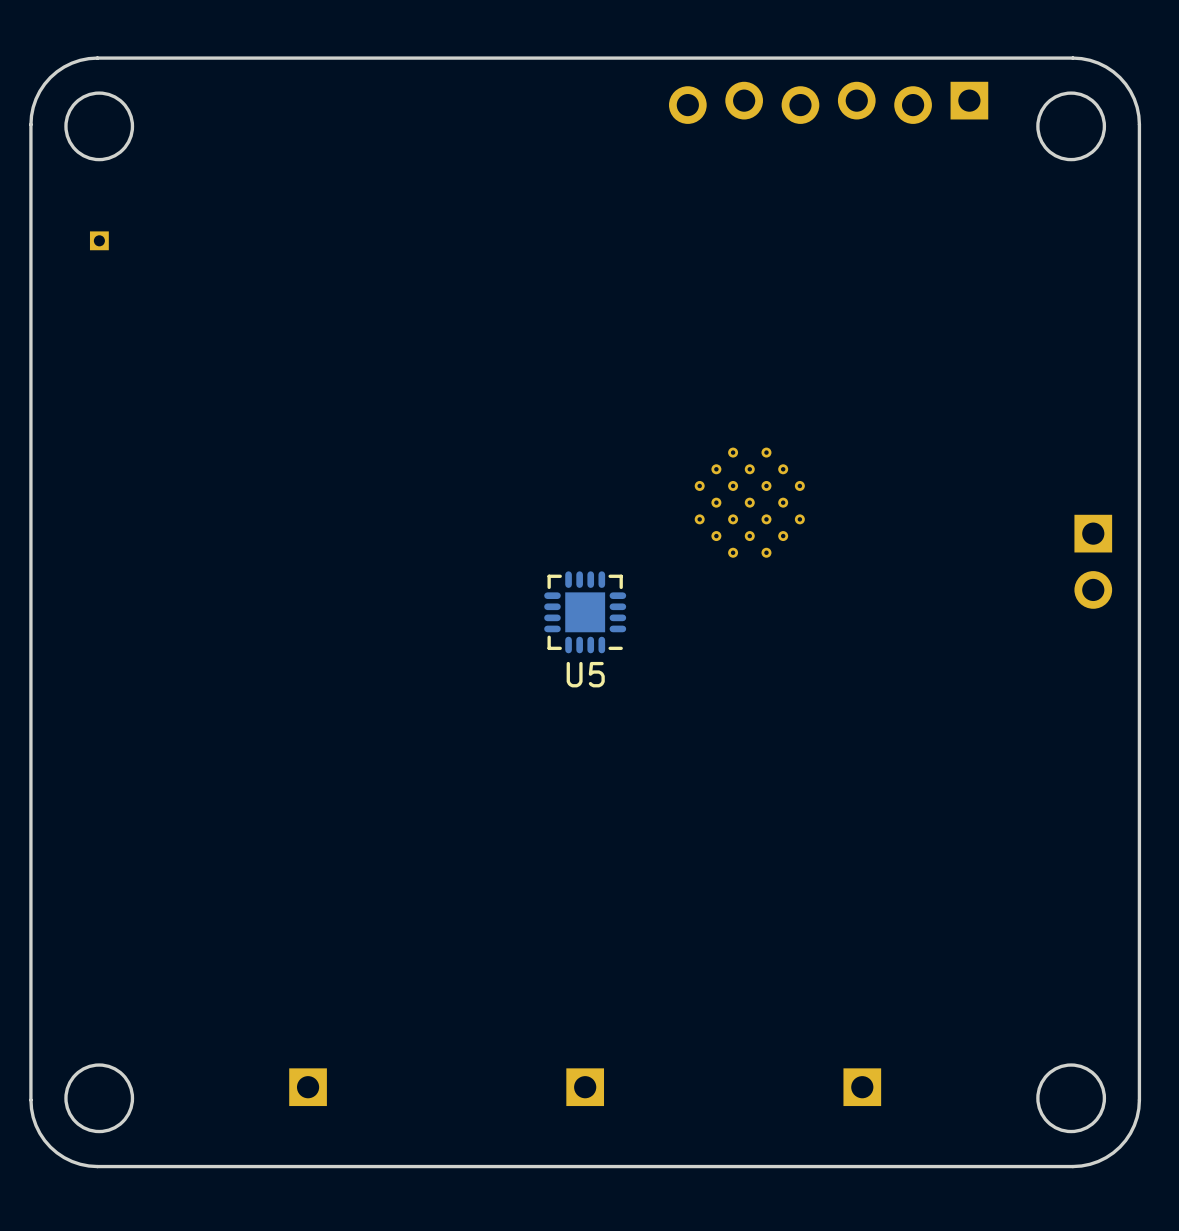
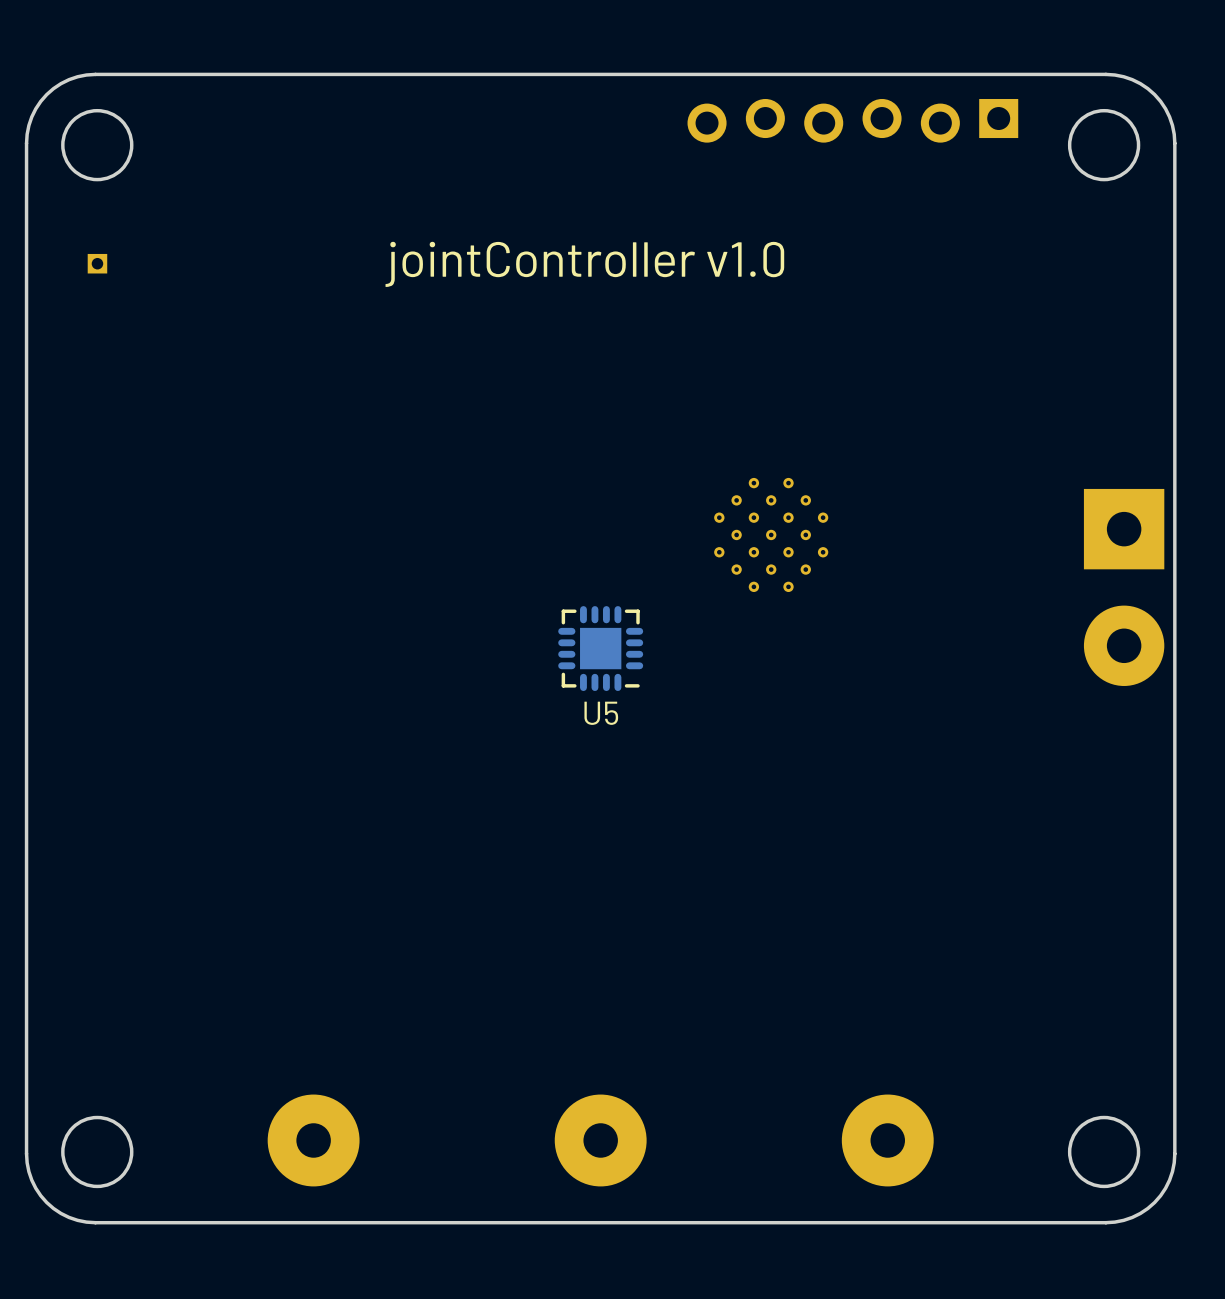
text: none -> jointController v1.0 (584, 264)
part footprint: [1074, 514, 1113, 609] -> [1083, 488, 1165, 686]
part footprint: [289, 1068, 327, 1107] -> [267, 1094, 360, 1187]
part footprint: [566, 1068, 605, 1107] -> [554, 1094, 647, 1187]
part footprint: [843, 1068, 882, 1107] -> [841, 1094, 934, 1187]

